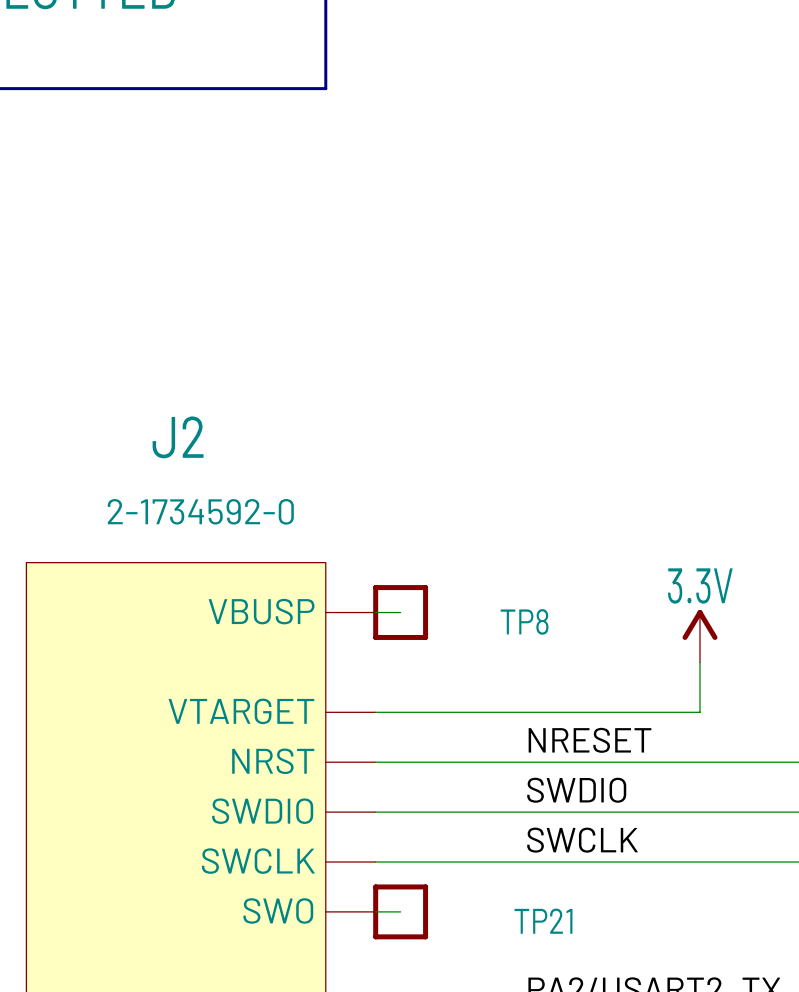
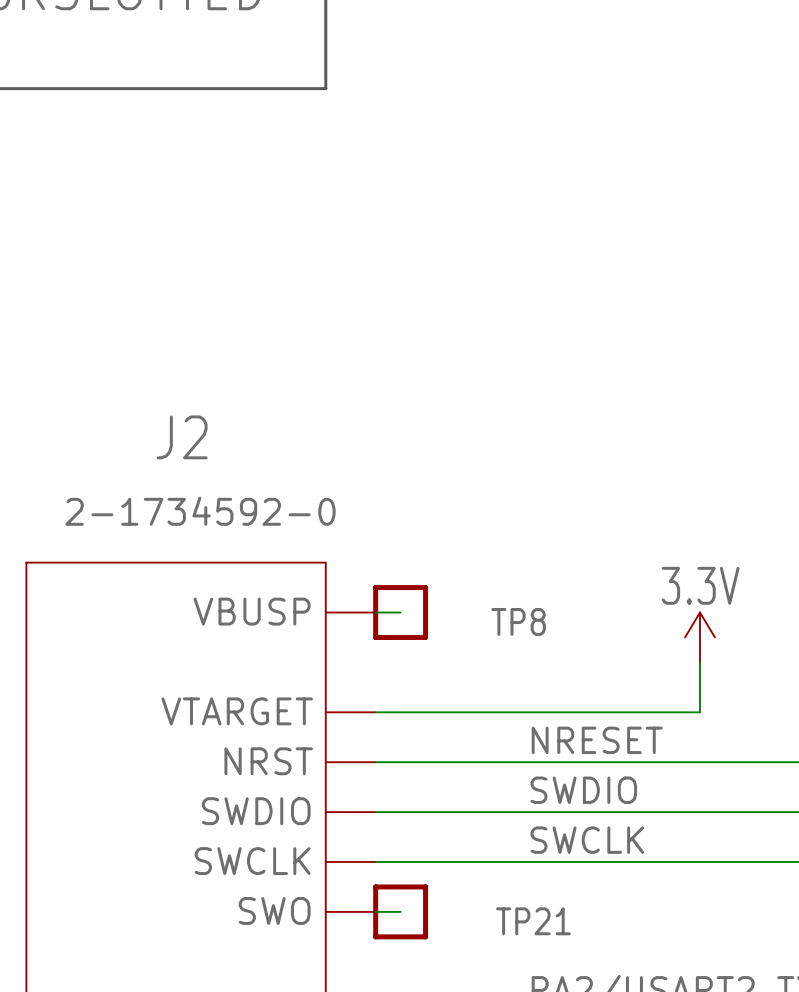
power symbol shape: [682, 610, 718, 663] -> [685, 612, 715, 663]

